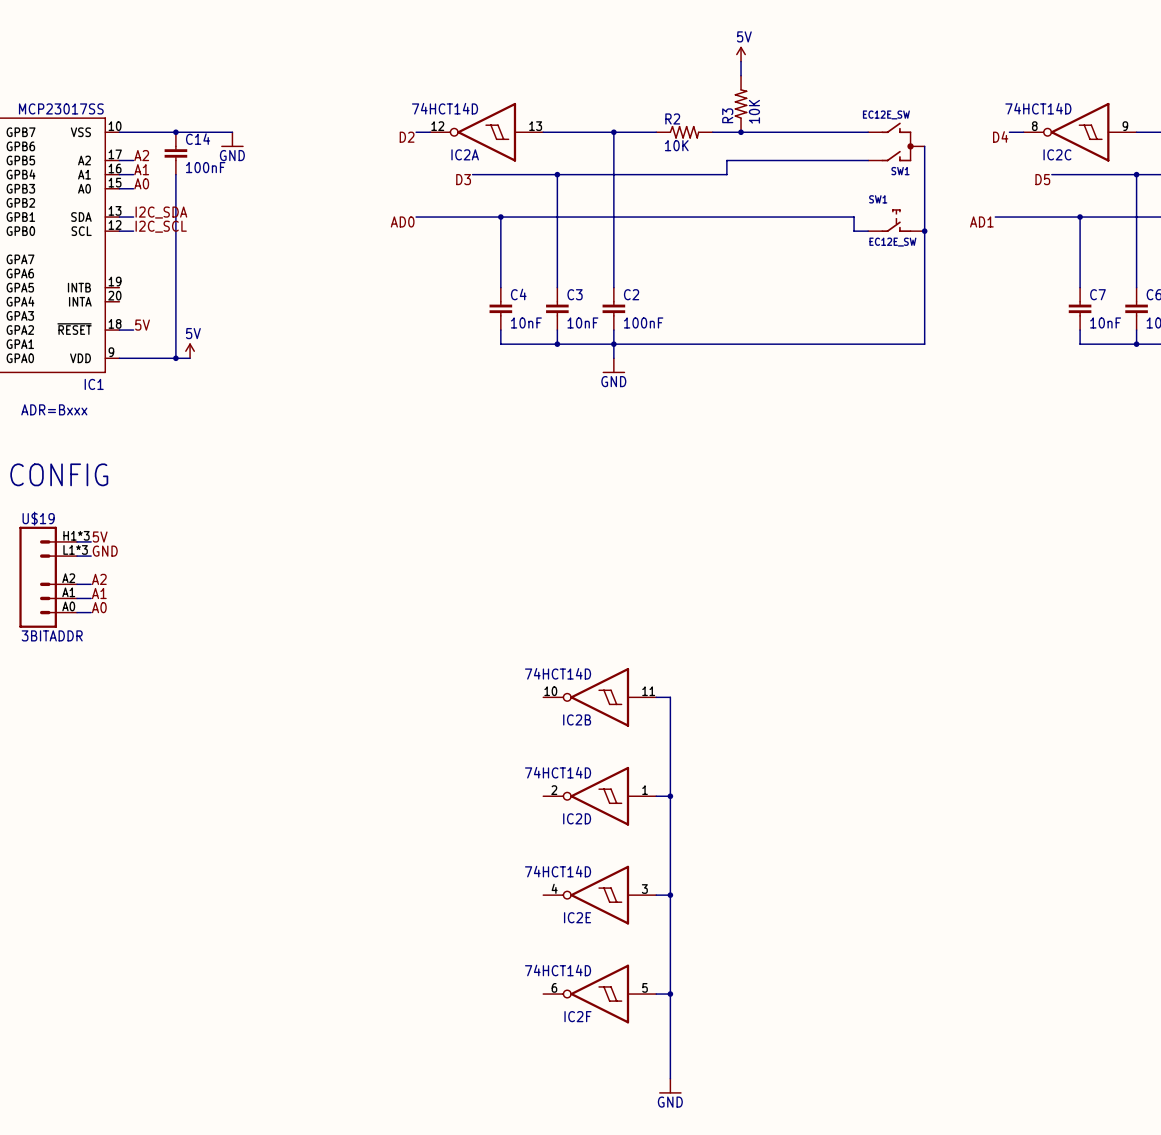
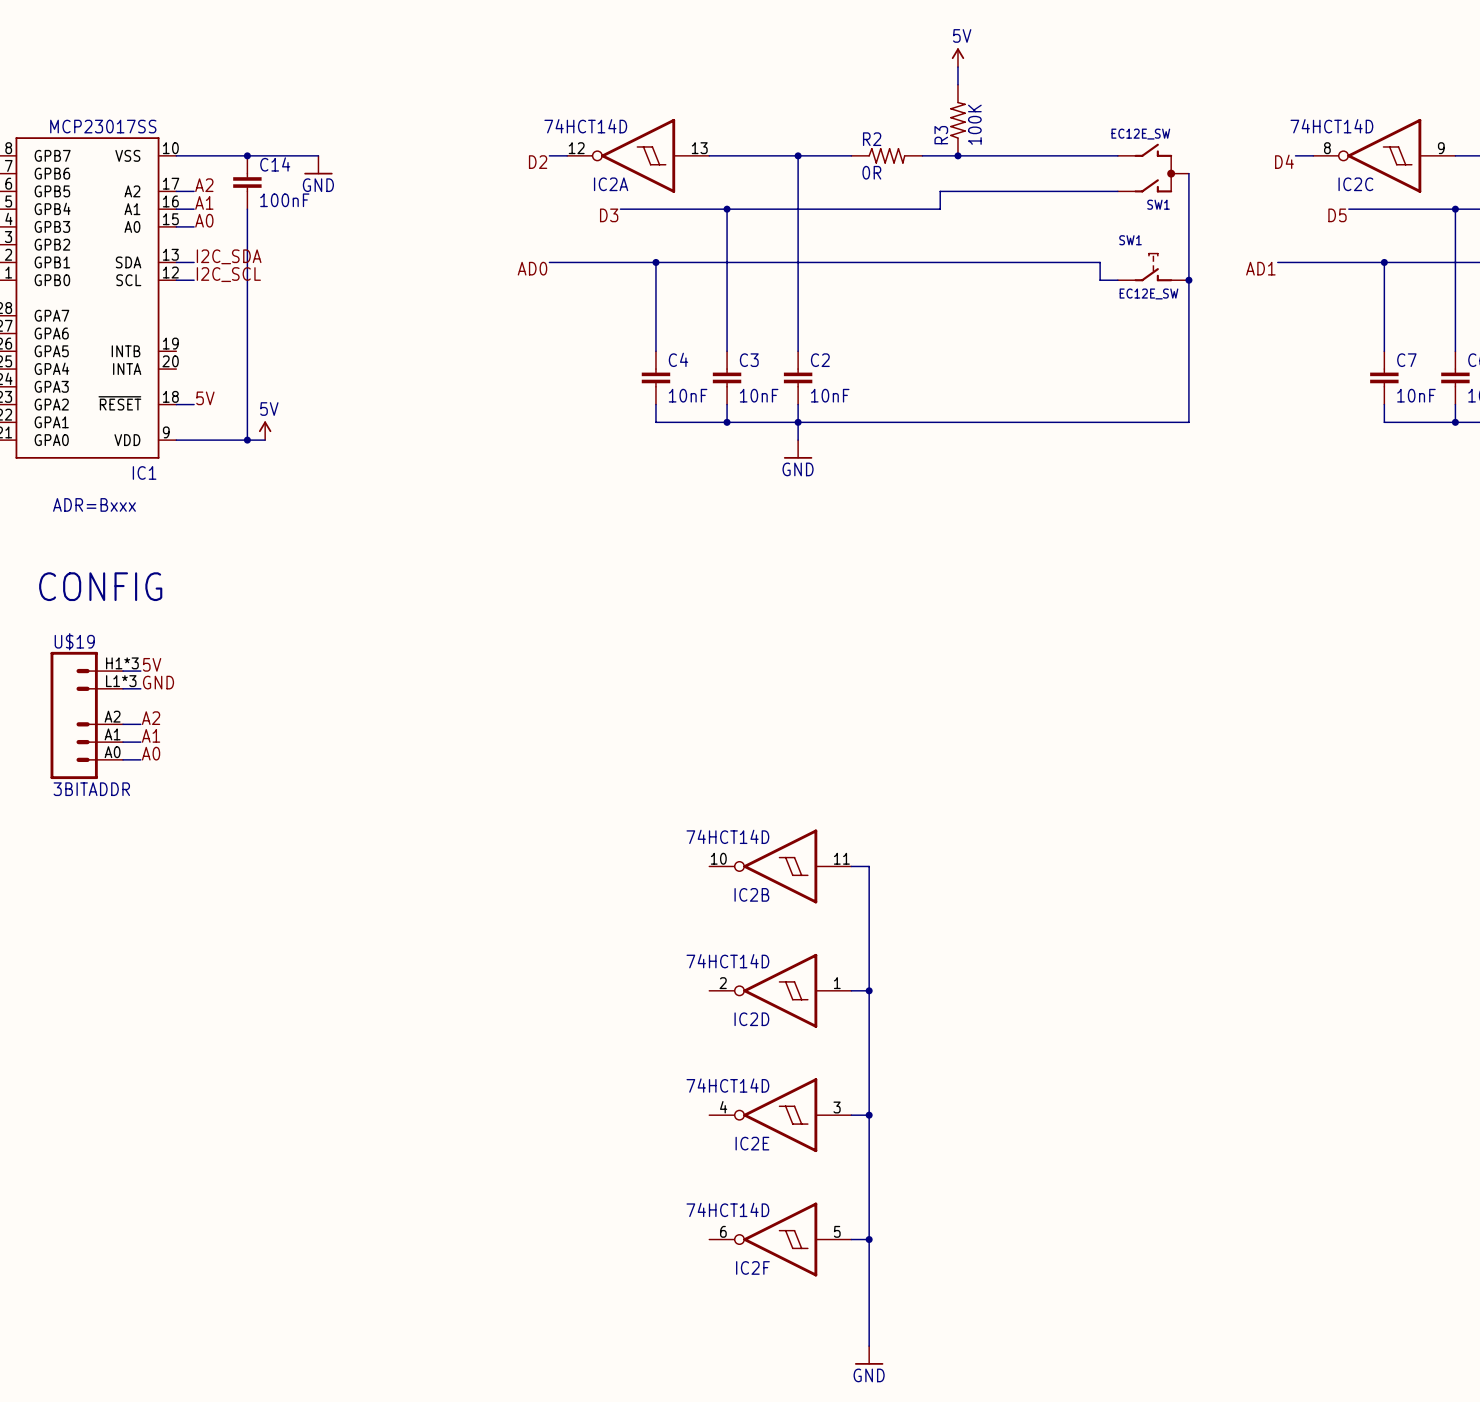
R3 value: 10K (754, 111) -> 100K (974, 124)
R2 value: 10K (676, 145) -> 0R (871, 172)
C2 value: 100nF (643, 322) -> 10nF (830, 395)

